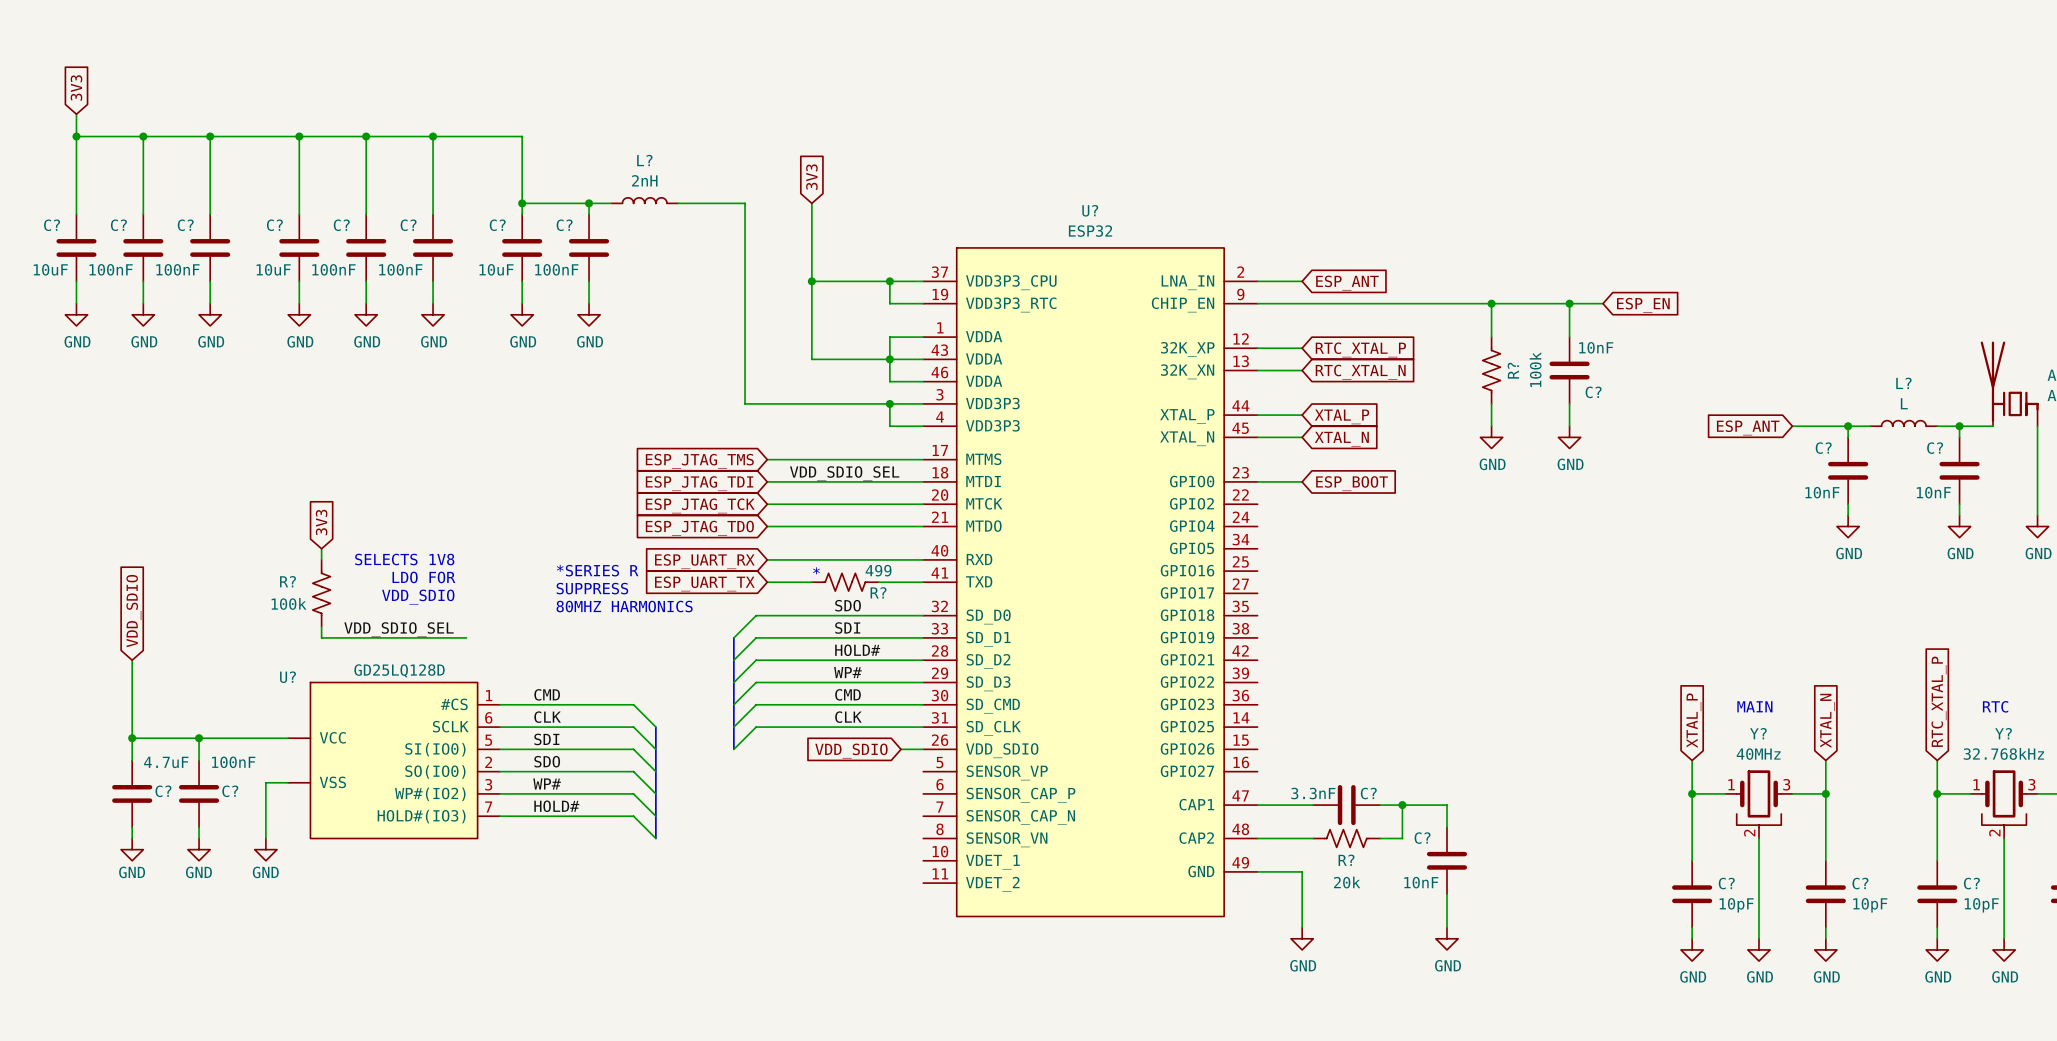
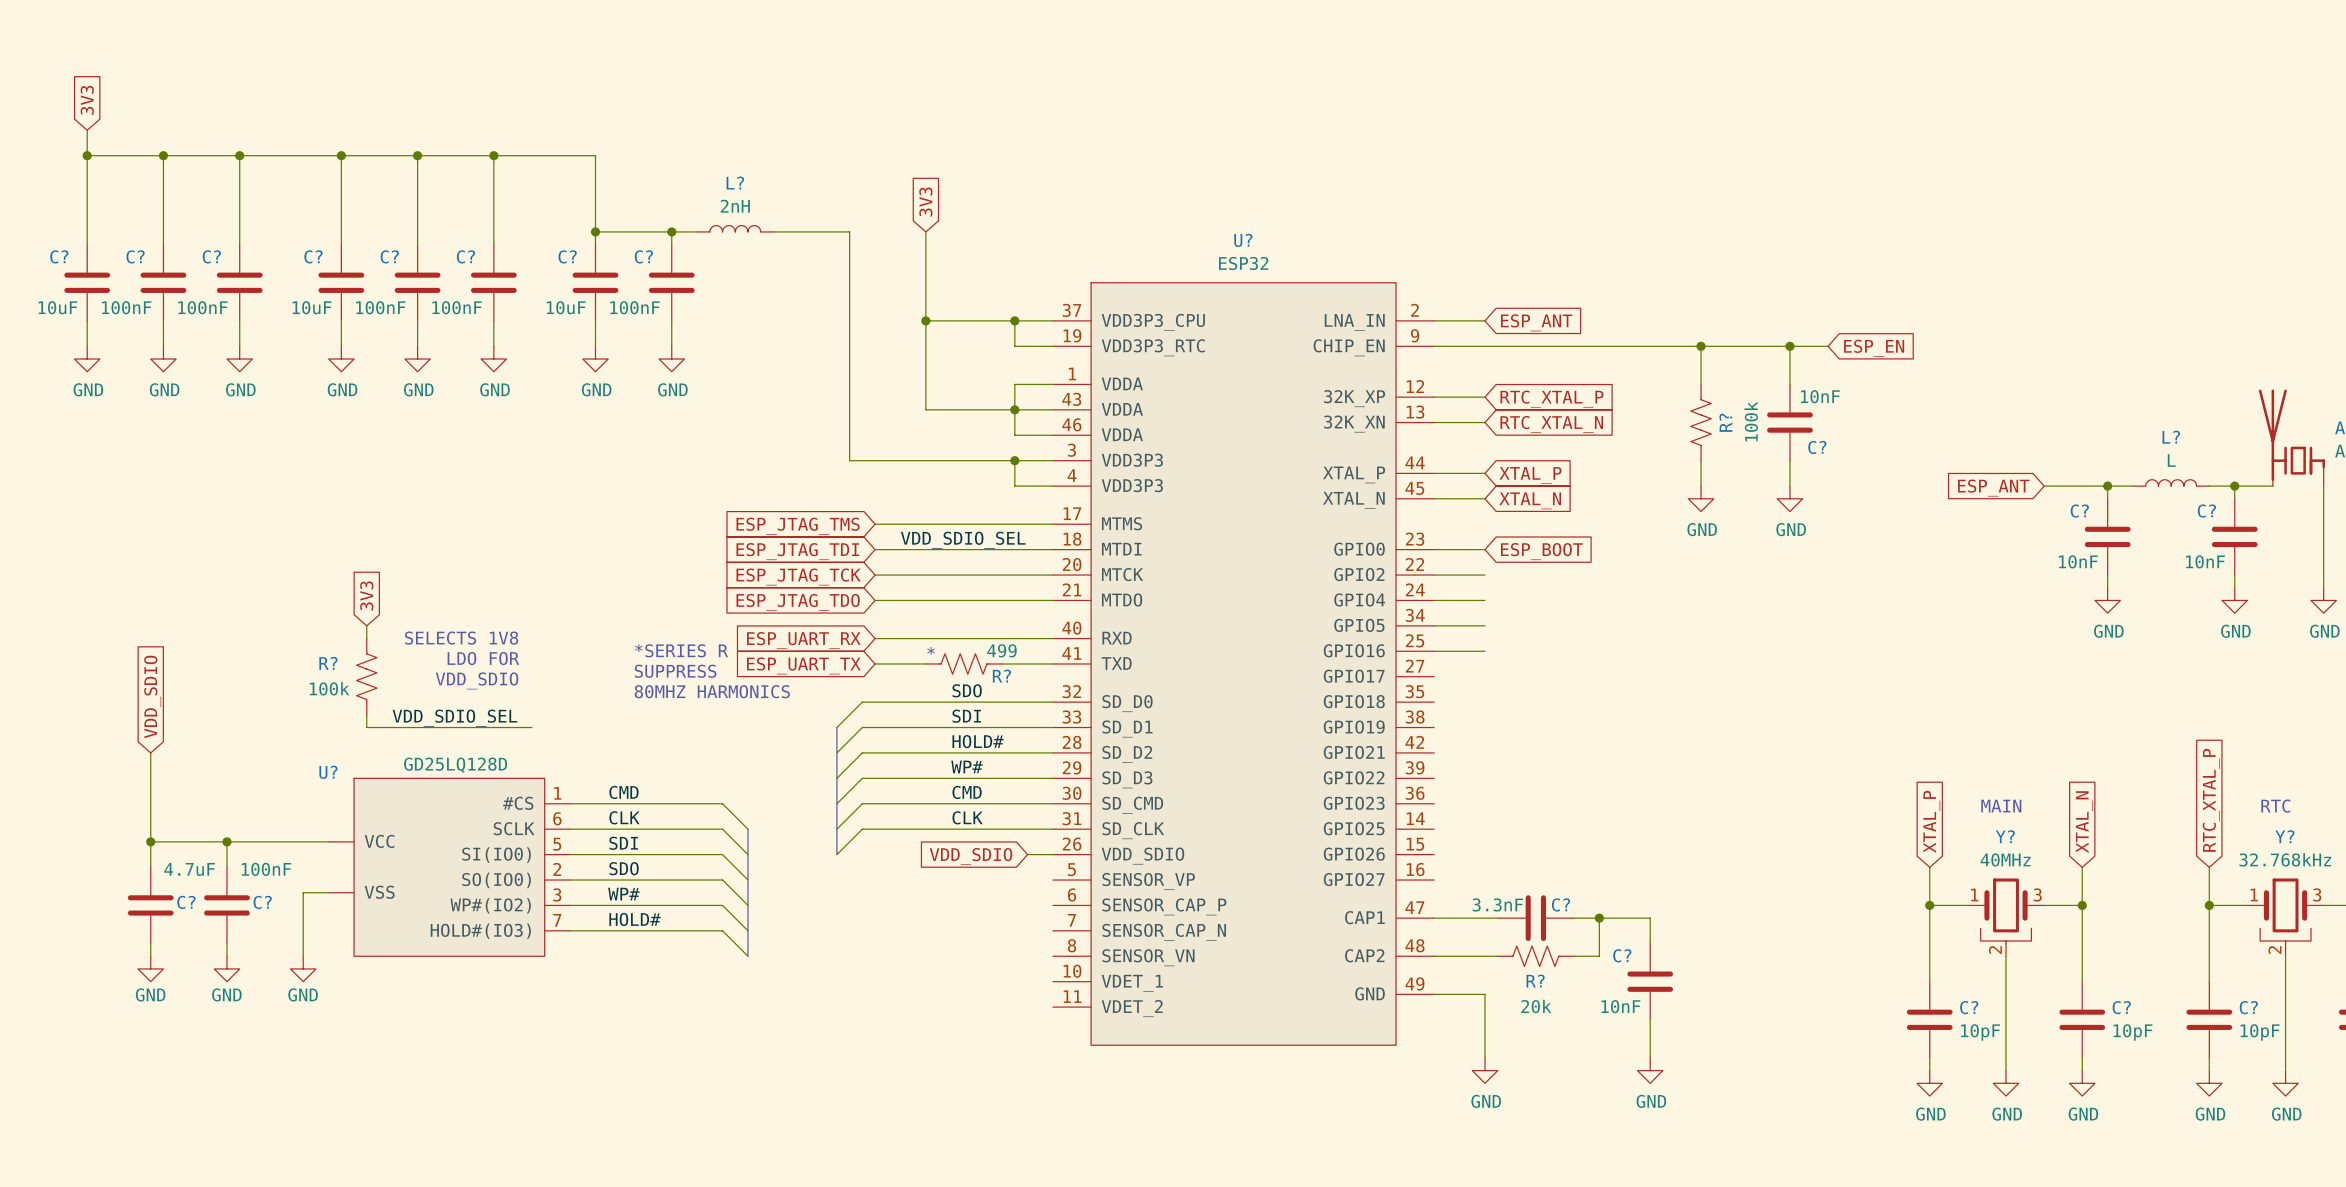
wire: none -> (1434, 575) (1485, 575)
wire: none -> (1434, 600) (1485, 600)
wire: none -> (1434, 625) (1485, 625)
wire: none -> (1434, 651) (1485, 651)

